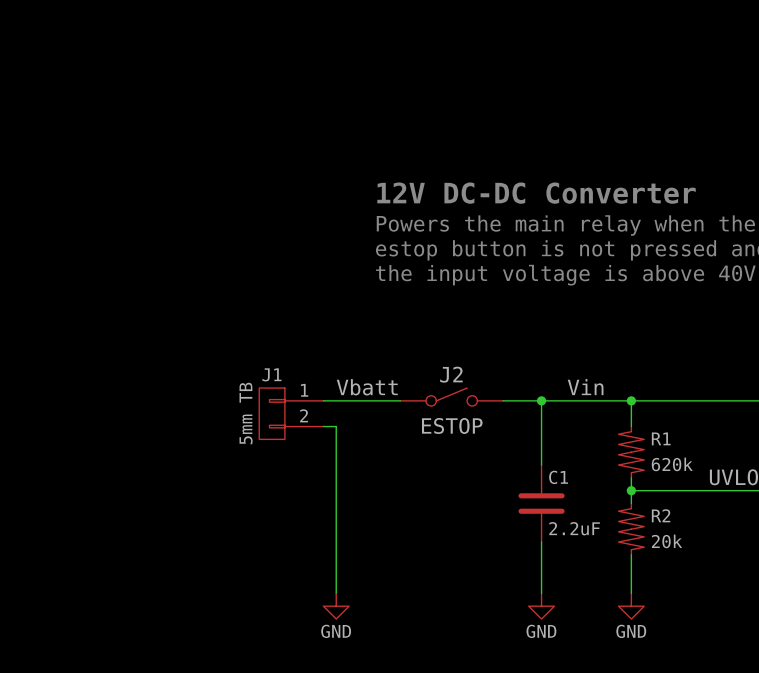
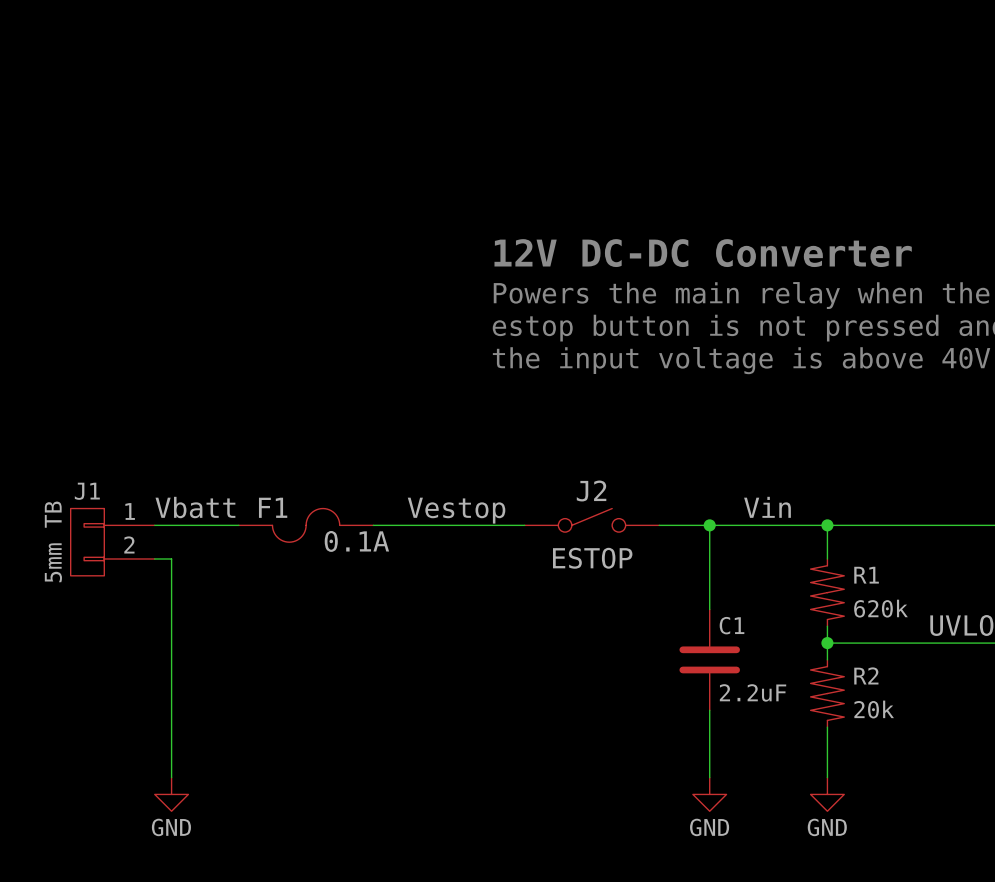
label position: Vbatt (367, 387) -> Vbatt (195, 507)
label: none -> Vestop (456, 510)
wire: none -> (154, 525) (238, 525)
F1: none -> 0.1A (306, 525)
J1 position: (291, 413) -> (112, 542)
wire: (323, 426) (336, 426) (336, 593) -> (154, 558) (171, 558) (171, 777)
power symbol position: GND (336, 606) -> GND (171, 794)

